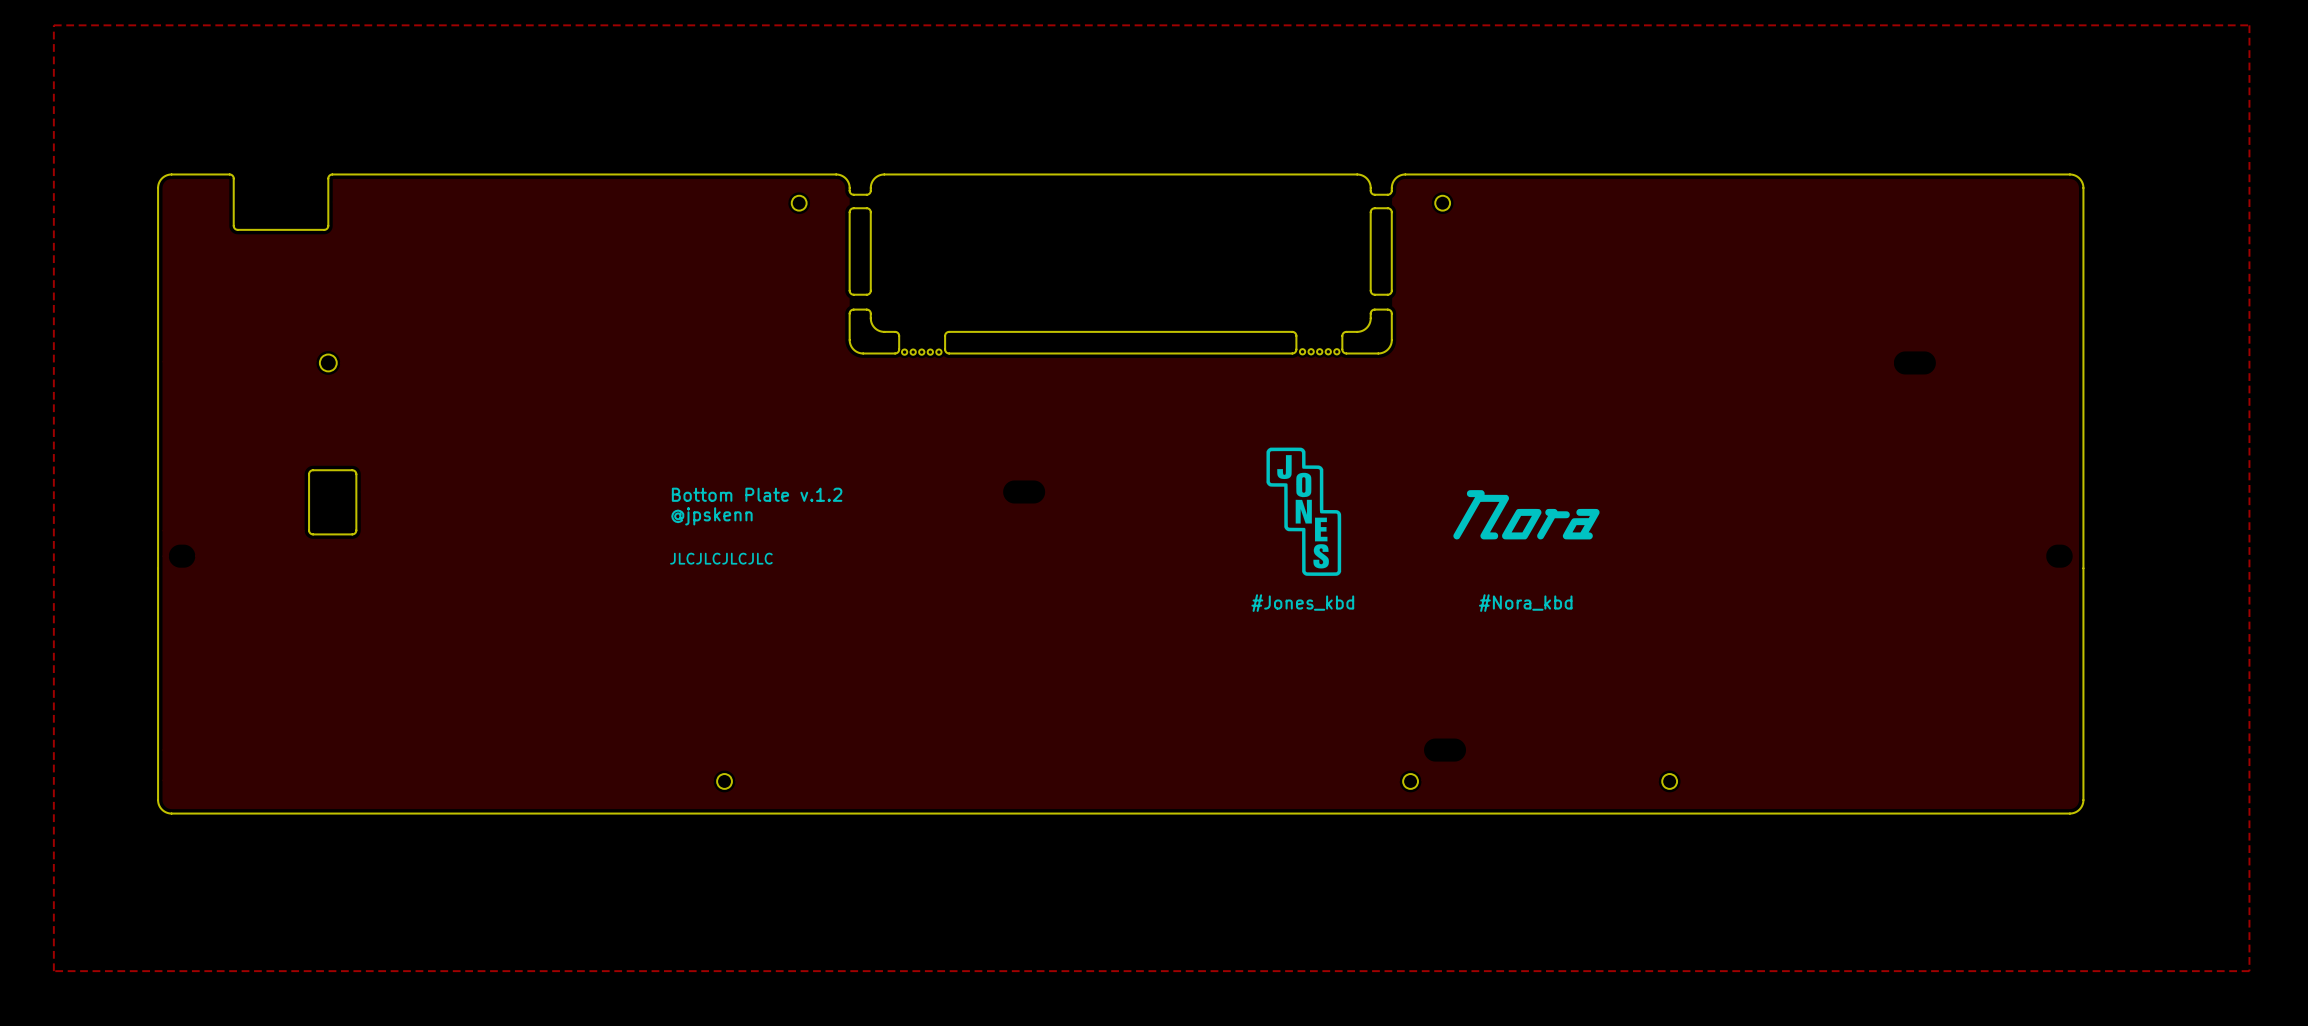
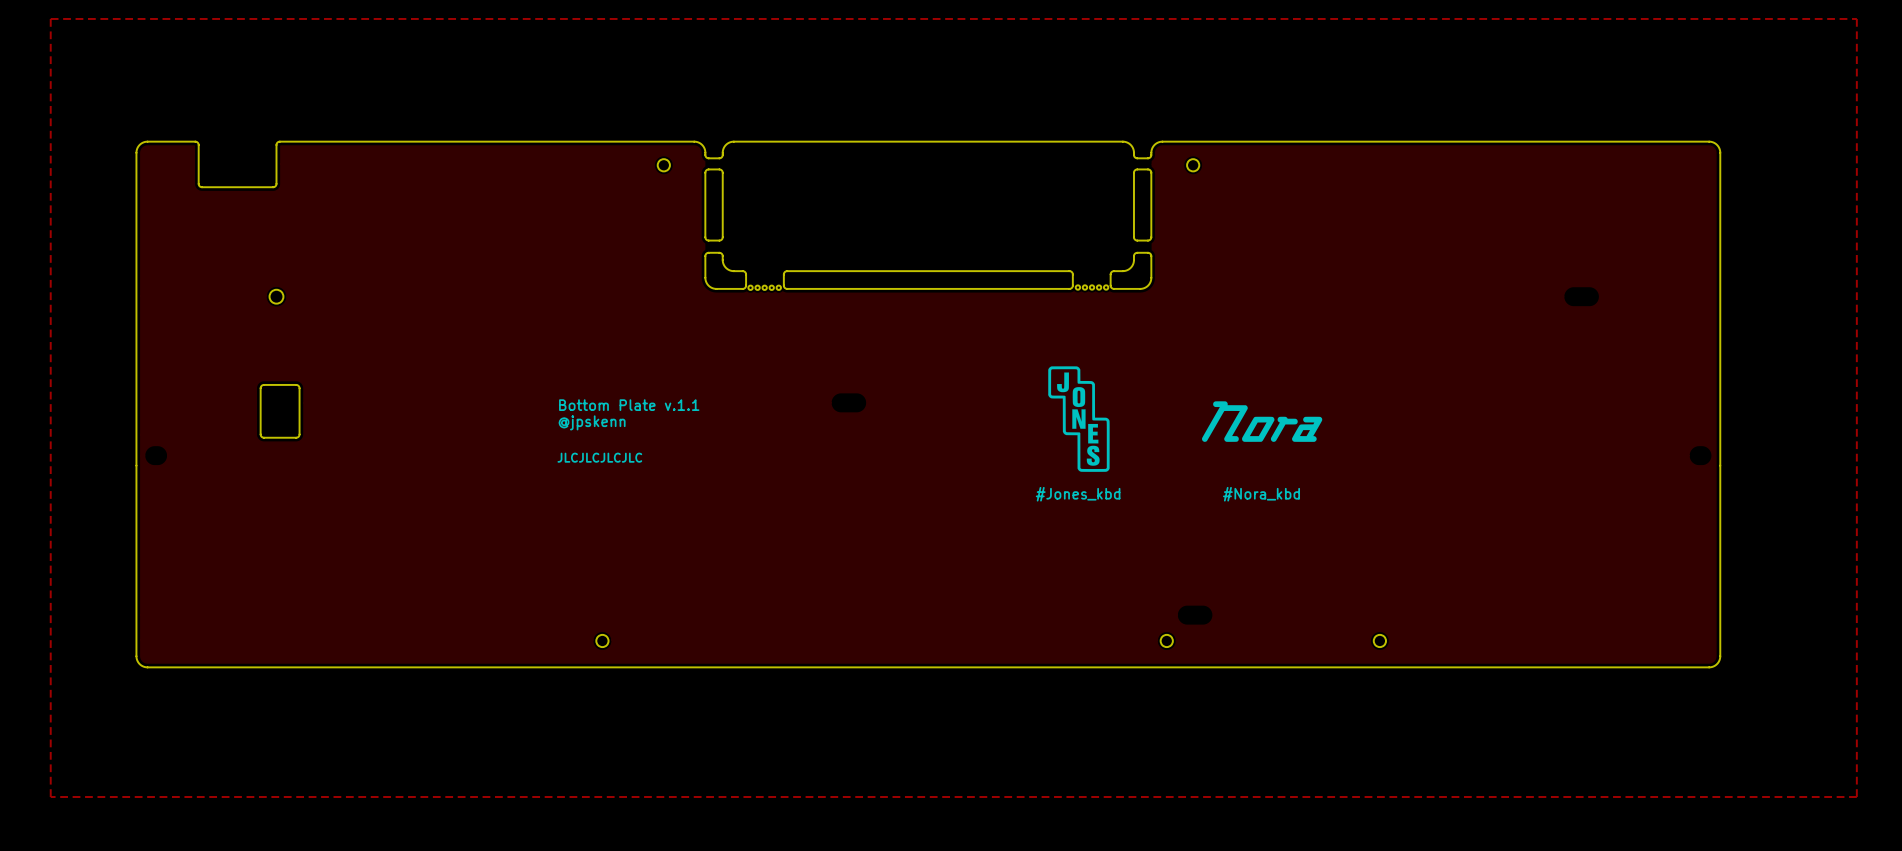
text: Bottom Plate v.1.2 (757, 494) -> Bottom Plate v.1.1 (629, 405)

